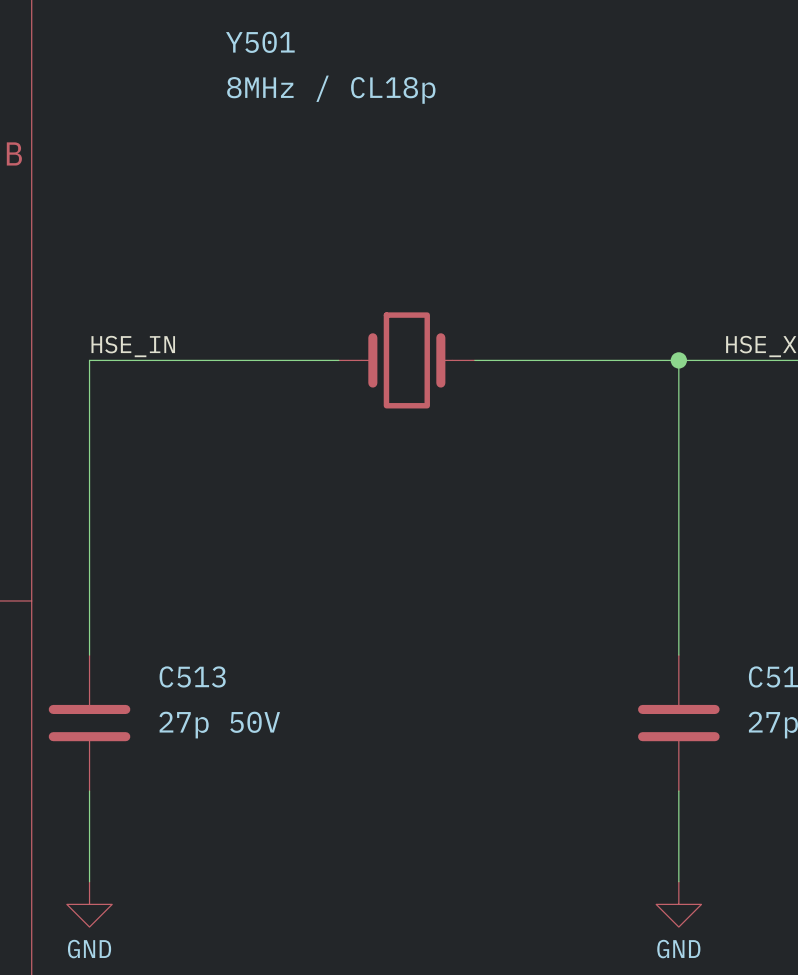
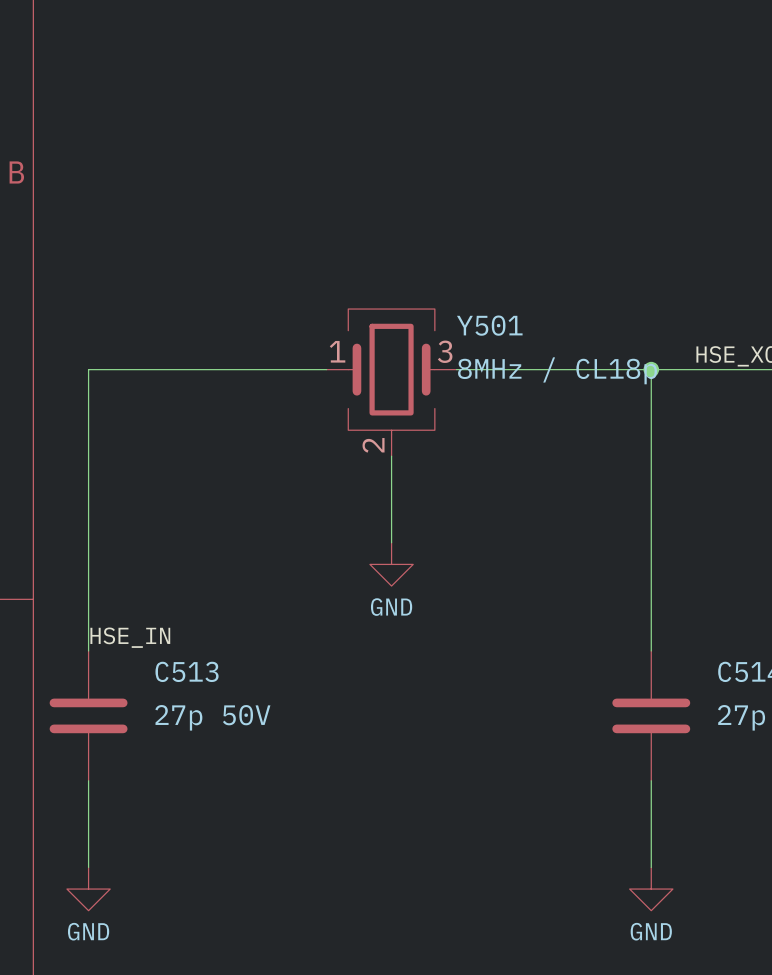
Y501 name position: Y501 (260, 42) -> Y501 (489, 325)
Y501 value position: 8MHz / CL18p (331, 89) -> 8MHz / CL18p (557, 370)
Y501 symbol: [338, 312, 475, 409] -> [326, 309, 457, 457]
label position: HSE_IN (133, 346) -> HSE_IN (130, 637)
wire: none -> (391, 456) (391, 542)
power symbol: none -> GND (391, 564)

